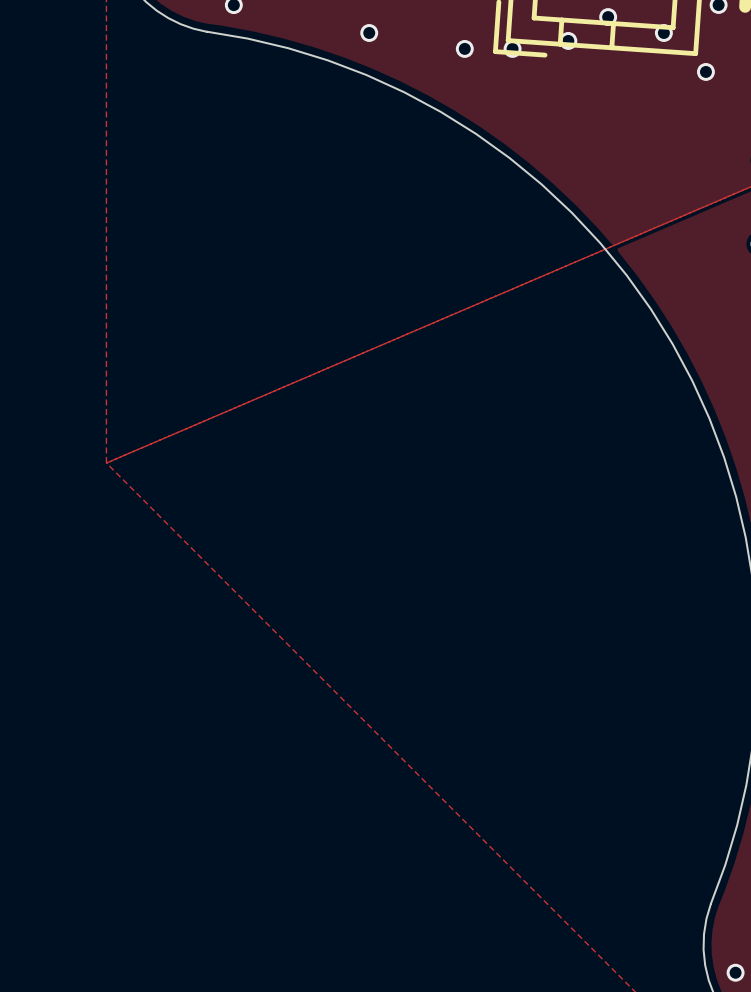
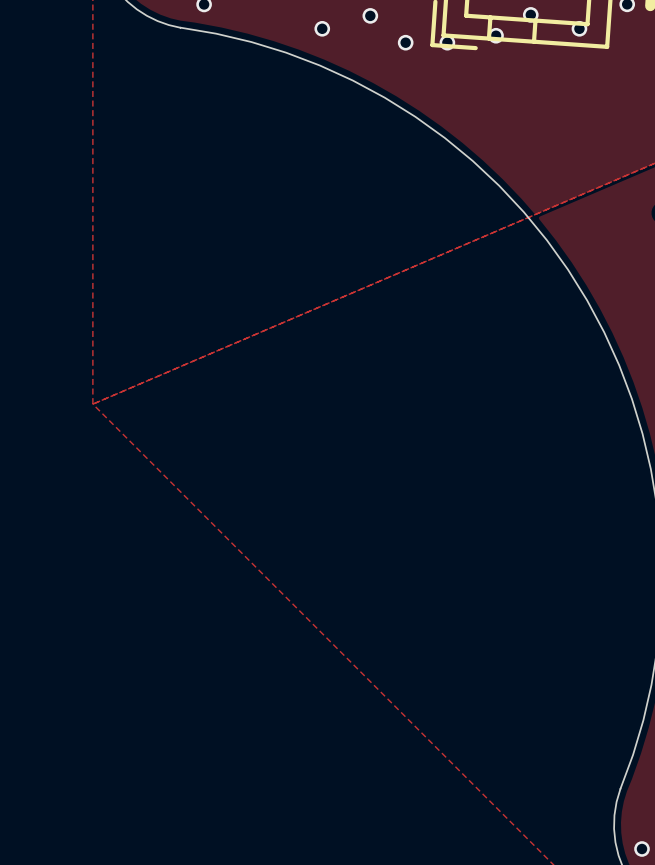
via: none -> (370, 15)
via: (705, 71) -> none

